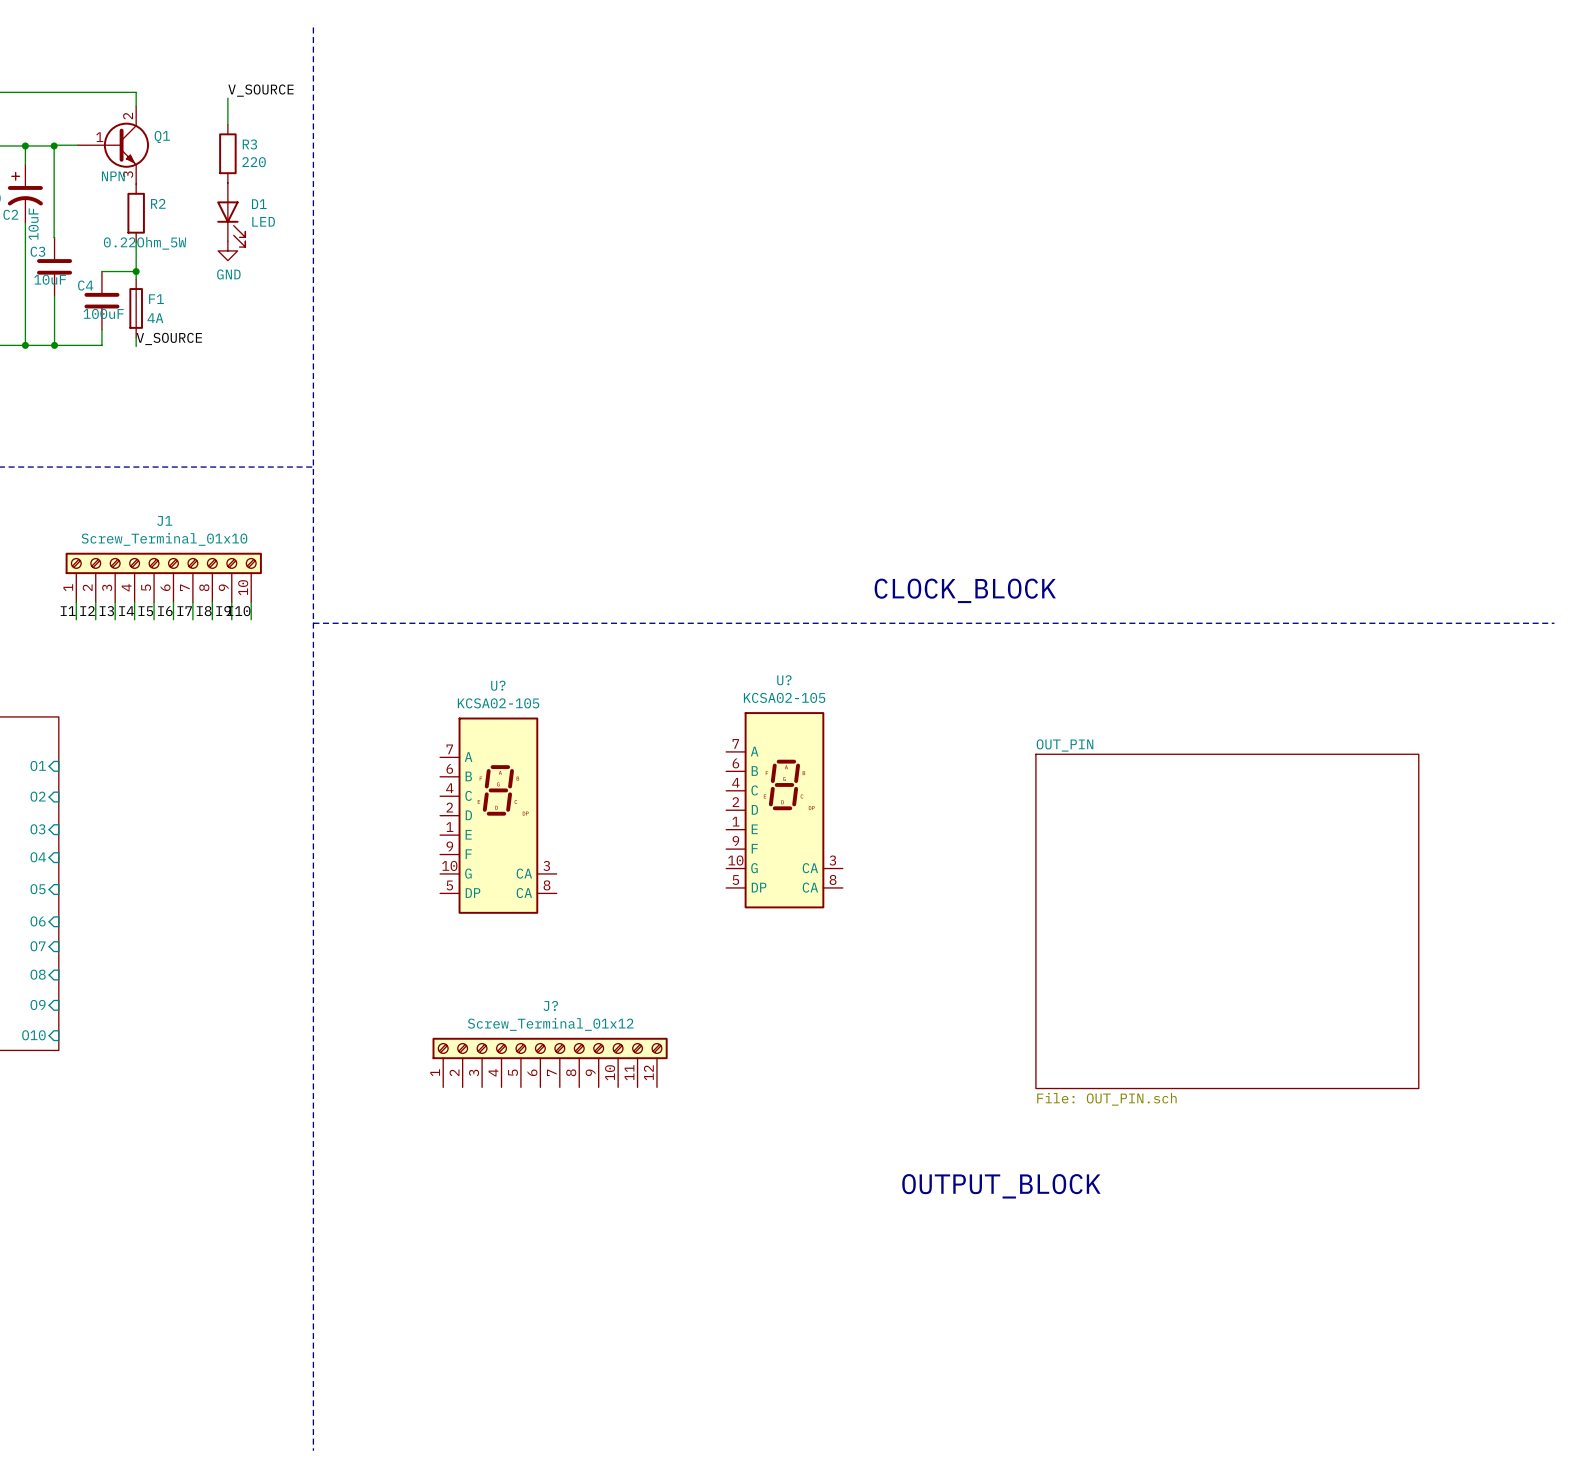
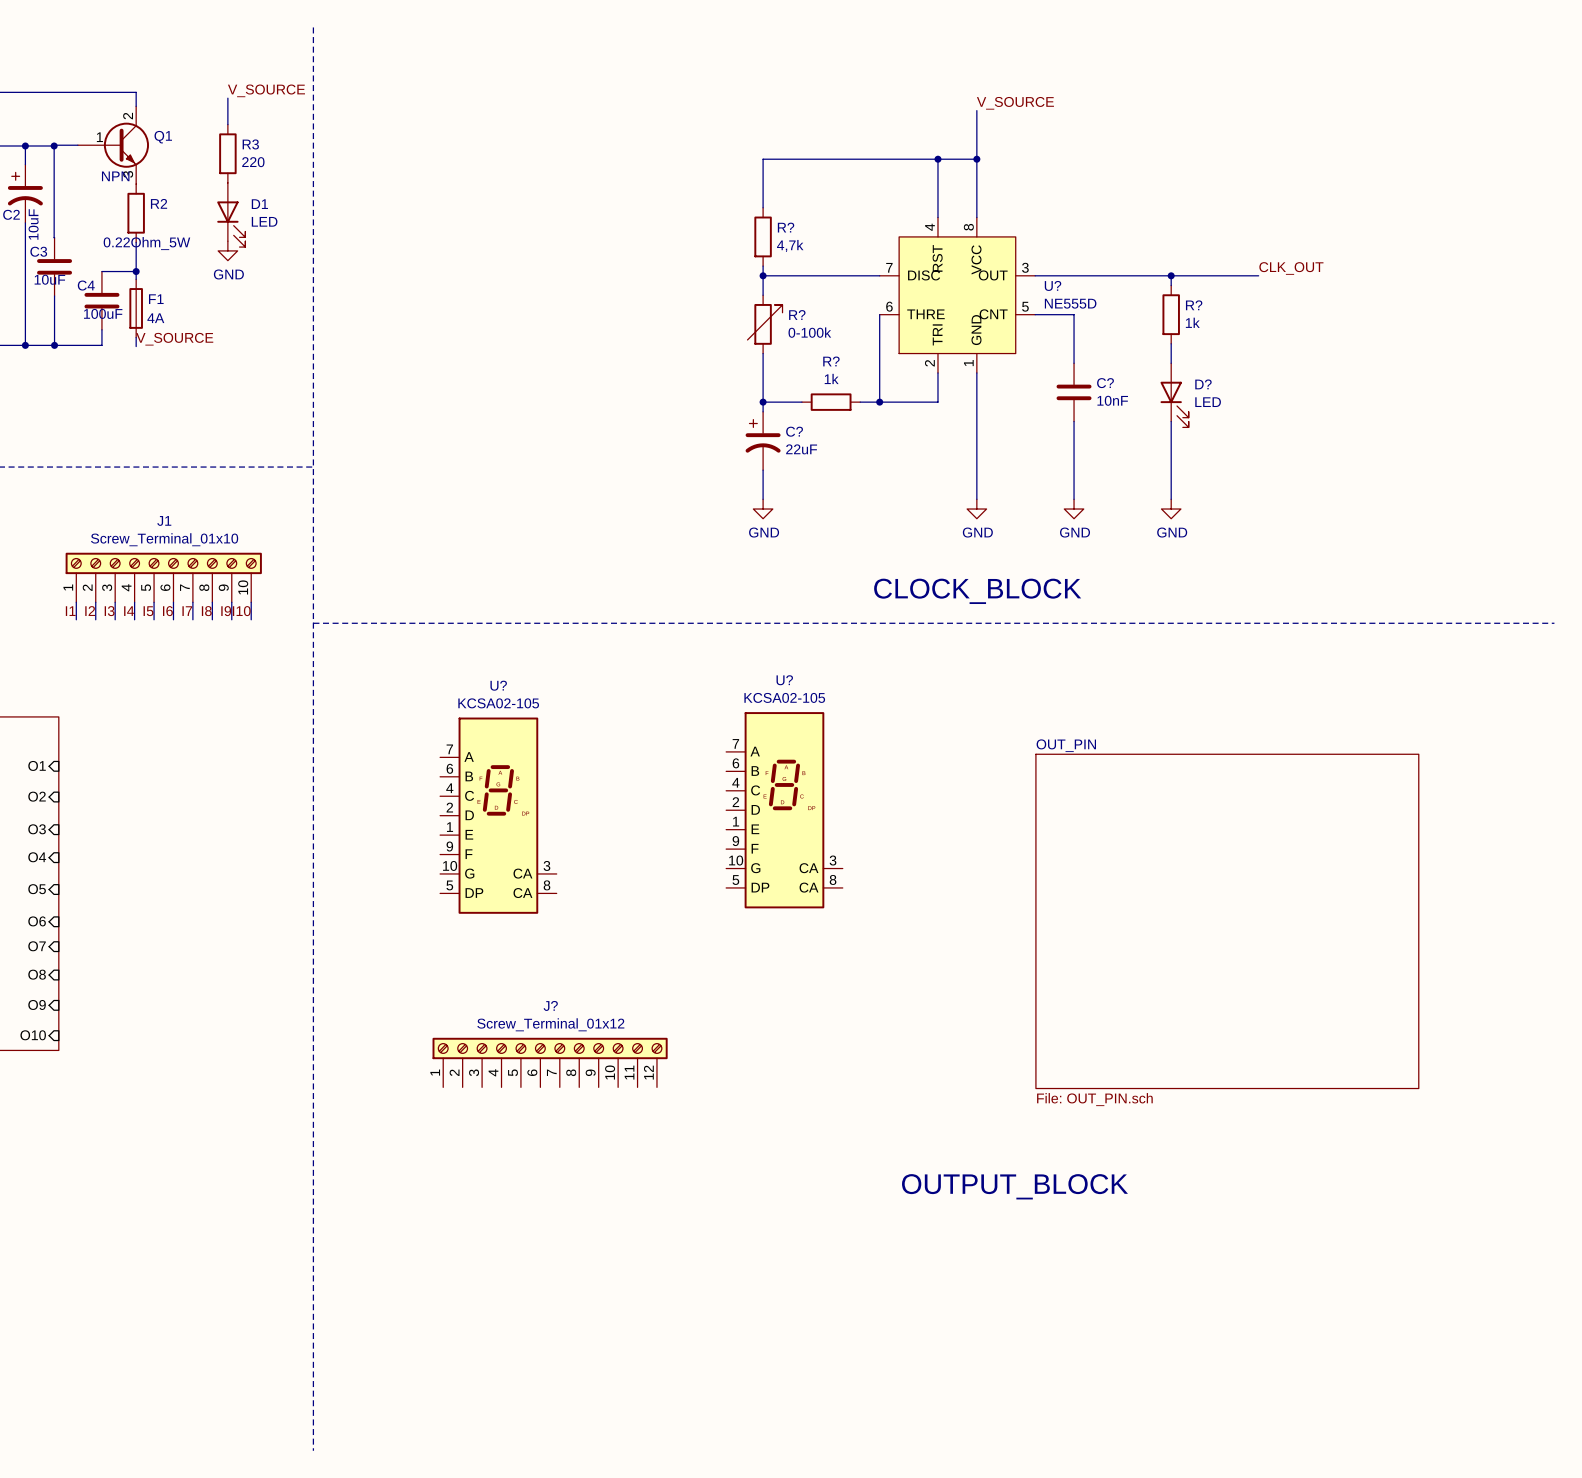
label: none -> V_SOURCE (1015, 103)
wire: none -> (976, 110) (976, 217)
wire: none -> (937, 159) (937, 217)
junction: none -> (937, 159)
wire: none -> (976, 159) (763, 159) (763, 207)
junction: none -> (976, 159)
R?: none -> 4,7k (763, 236)
wire: none -> (763, 266) (763, 295)
label: none -> CLK_OUT (1291, 268)
wire: none -> (763, 275) (879, 275)
junction: none -> (763, 275)
wire: none -> (1035, 275) (1258, 275)
wire: none -> (1171, 275) (1171, 285)
junction: none -> (1171, 275)
U?: none -> NE555D (957, 295)
wire: none -> (879, 314) (879, 402)
wire: none -> (1035, 314) (1074, 314) (1074, 363)
R?: none -> 1k (1171, 314)
R?: none -> 0-100k (765, 324)
wire: none -> (1171, 343) (1171, 363)
wire: none -> (763, 353) (763, 411)
wire: none -> (937, 372) (937, 402) (860, 402)
wire: none -> (976, 372) (976, 499)
C?: none -> 10nF (1074, 392)
D?: none -> LED (1174, 395)
wire: none -> (763, 402) (801, 402)
junction: none -> (763, 402)
R?: none -> 1k (831, 402)
junction: none -> (879, 402)
wire: none -> (1074, 421) (1074, 499)
wire: none -> (1171, 421) (1171, 499)
C?: none -> 22uF (763, 440)
wire: none -> (763, 470) (763, 499)
power symbol: none -> GND (763, 509)
power symbol: none -> GND (976, 509)
power symbol: none -> GND (1074, 509)
power symbol: none -> GND (1171, 509)

